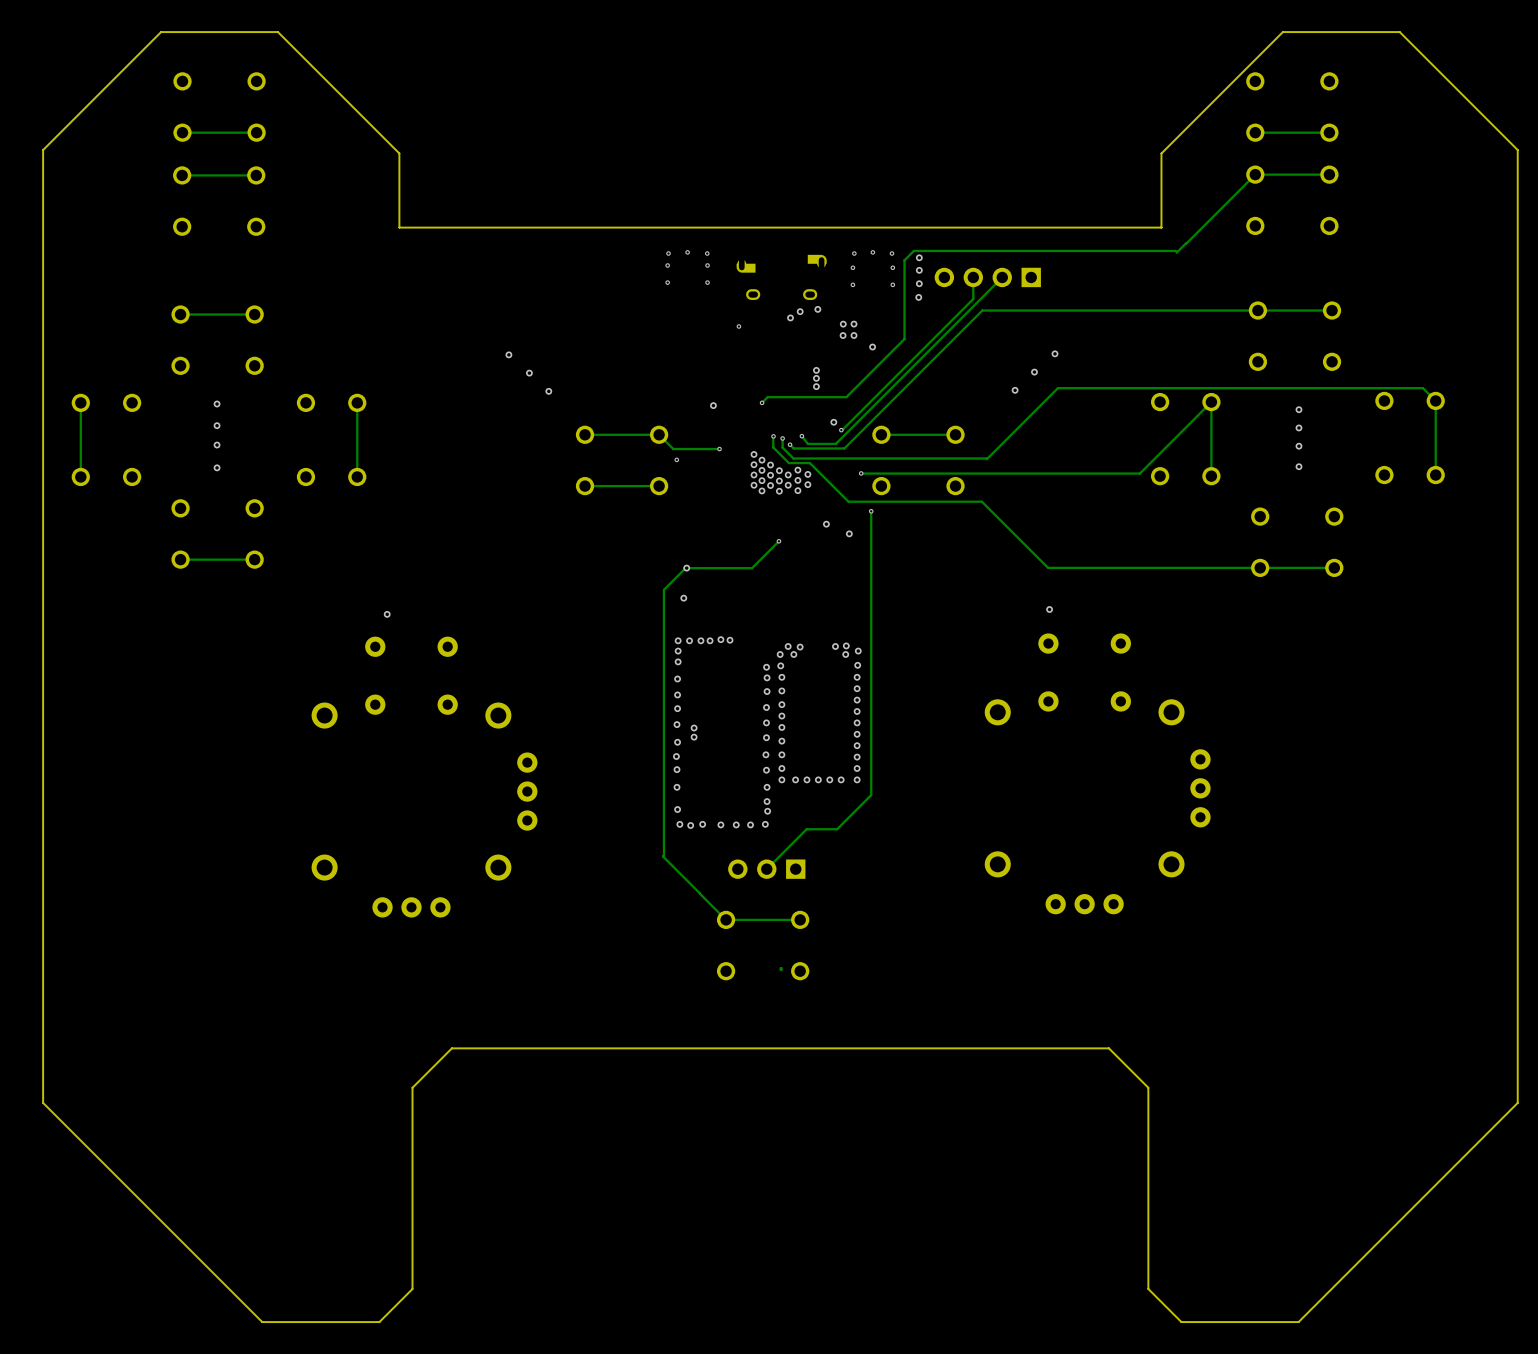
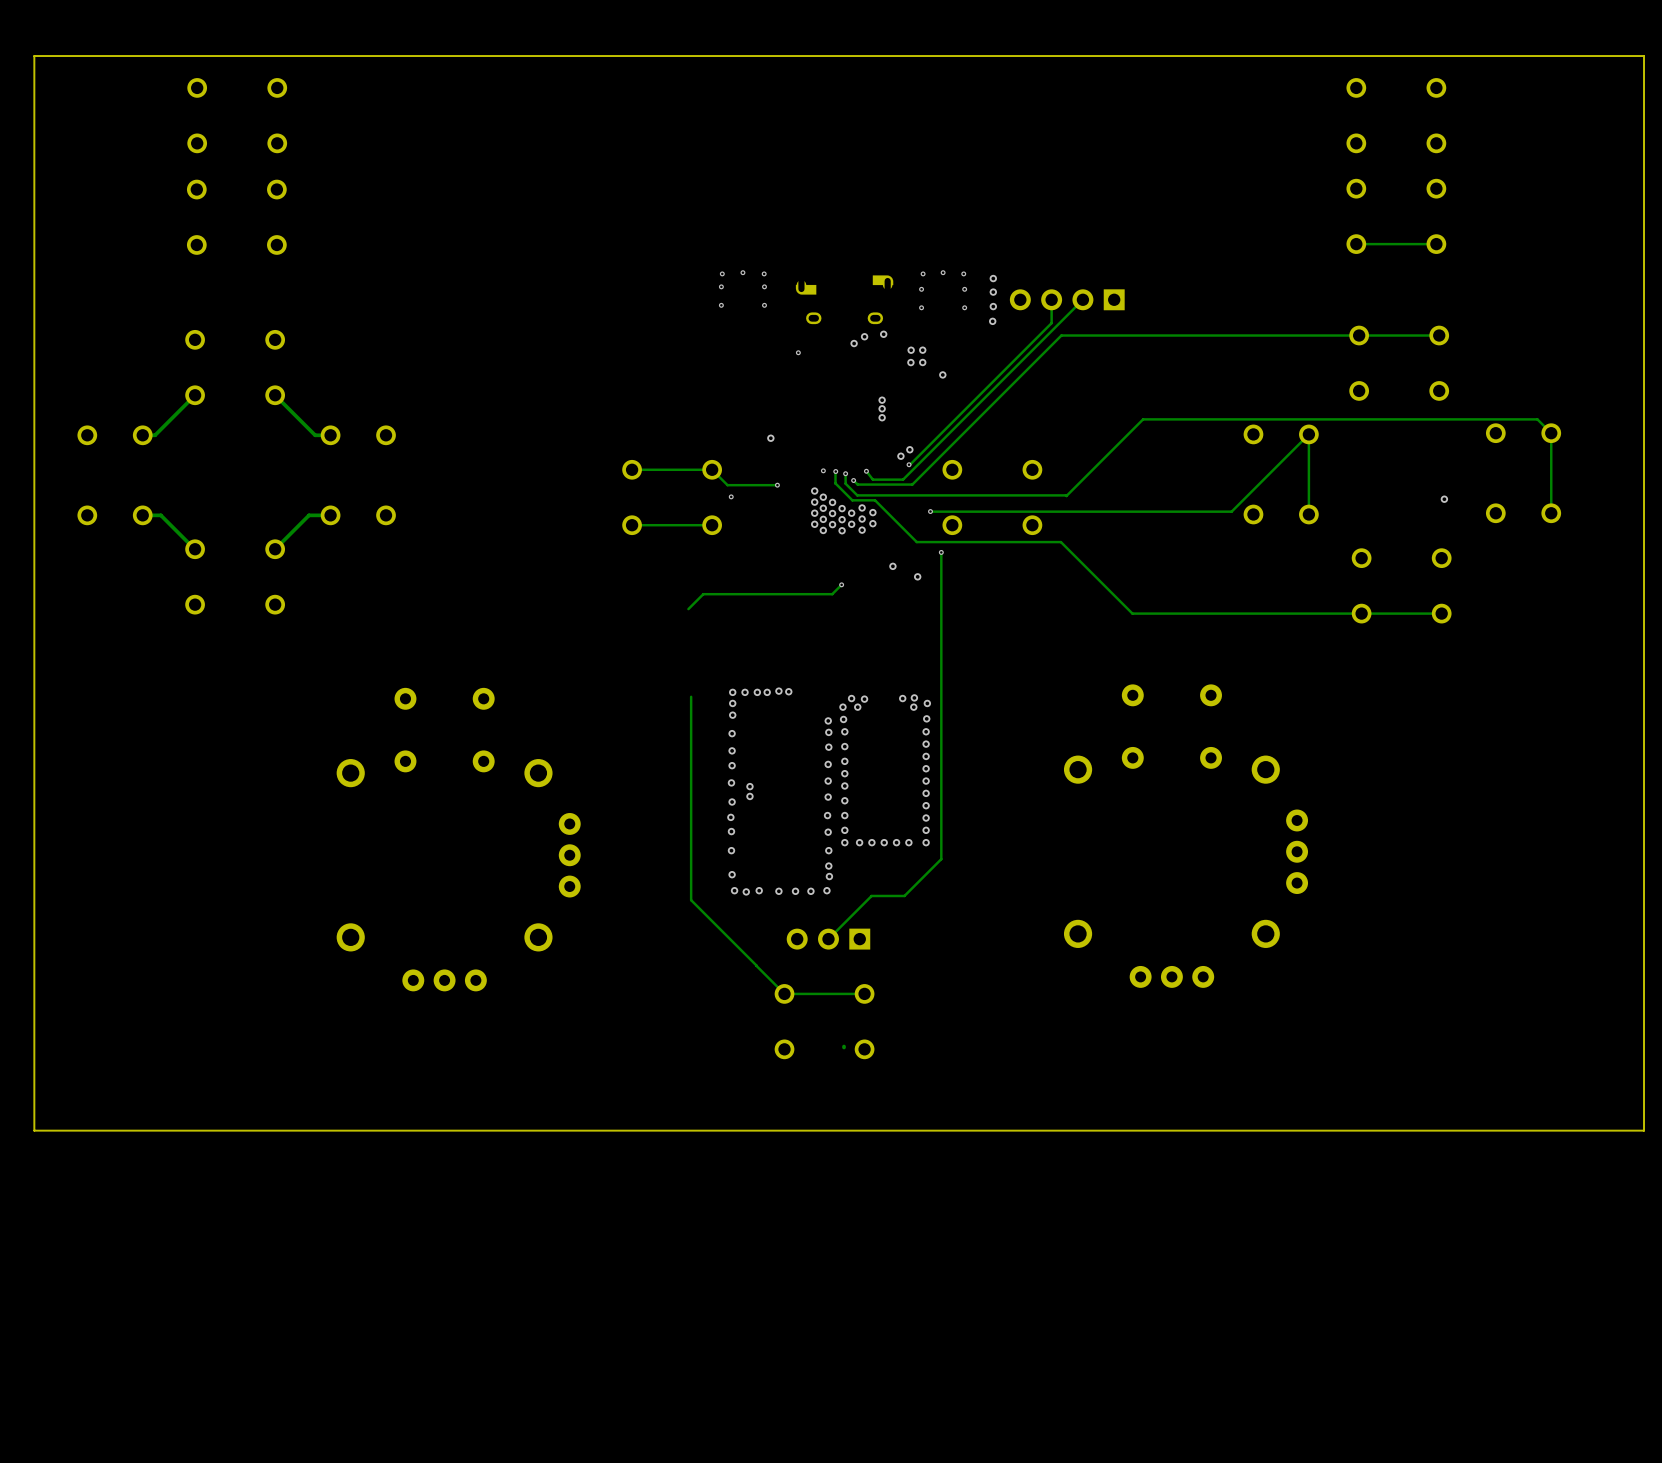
board edge: (1399, 32) (1282, 32) (1161, 153) (1161, 227) (399, 227) (399, 153) (277, 32) (161, 32) (43, 150) (43, 1102) (262, 1322) (379, 1322) (412, 1289) (412, 1087) (451, 1048) (1108, 1048) (1148, 1087) (1148, 1288) (1181, 1322) (1298, 1322) (1517, 1102) (1517, 150) (1399, 32) -> (1644, 56) (1644, 1130) (34, 1130) (34, 56) (1644, 56)
track: (256, 132) (182, 132) -> none
track: (1329, 132) (1255, 132) -> (1436, 244) (1356, 244)
track: (1329, 174) (1255, 174) (1176, 252) (913, 250) (904, 260) (904, 339) (846, 397) (767, 397) (762, 402) -> none
track: (256, 175) (182, 175) -> none
track: (254, 314) (180, 314) -> none
via: (1054, 353) -> none
via: (508, 354) -> none
track: none -> (195, 395) (155, 435) (142, 435)
track: none -> (275, 395) (315, 435) (330, 435)
via: (1034, 372) -> none
via: (529, 373) -> none
via: (1015, 390) -> none
via: (548, 391) -> none
track: (80, 402) (80, 476) -> none
track: (357, 402) (357, 476) -> none
via position: (762, 402) -> (823, 470)
via: (217, 404) -> none
via: (1298, 409) -> none
via: none -> (909, 449)
via: (217, 425) -> none
via: (1298, 427) -> none
track: (955, 434) (881, 434) -> none
via: (217, 445) -> none
via: (1298, 446) -> none
via: none -> (1444, 499)
via: (1298, 466) -> none
via: (217, 467) -> none
track: none -> (142, 515) (160, 515) (195, 549)
track: none -> (330, 515) (309, 515) (275, 549)
track: (770, 549) (752, 568) (685, 568) (663, 589) (662, 856) -> (691, 696) (691, 900) (716, 925)
track: none -> (832, 594) (703, 594) (688, 609)
track: (254, 559) (180, 559) -> none
via: (686, 568) -> none
via: (683, 598) -> none
via: (1049, 609) -> none
via: (387, 614) -> none

